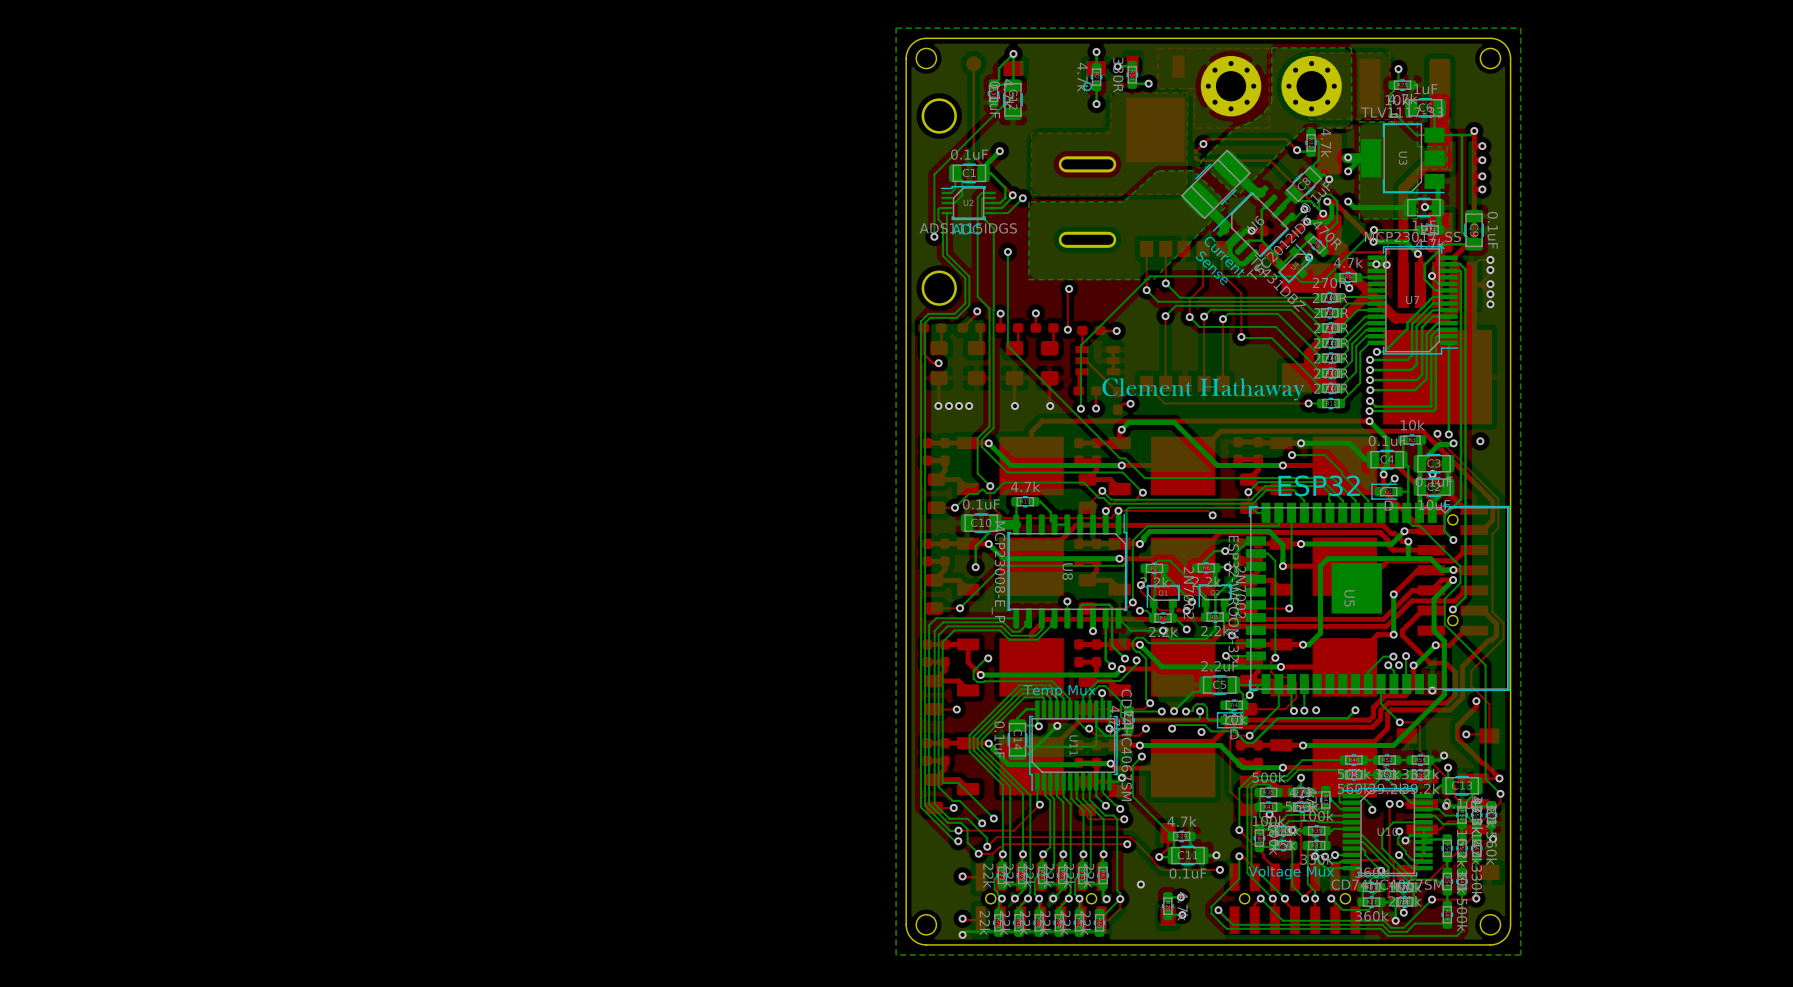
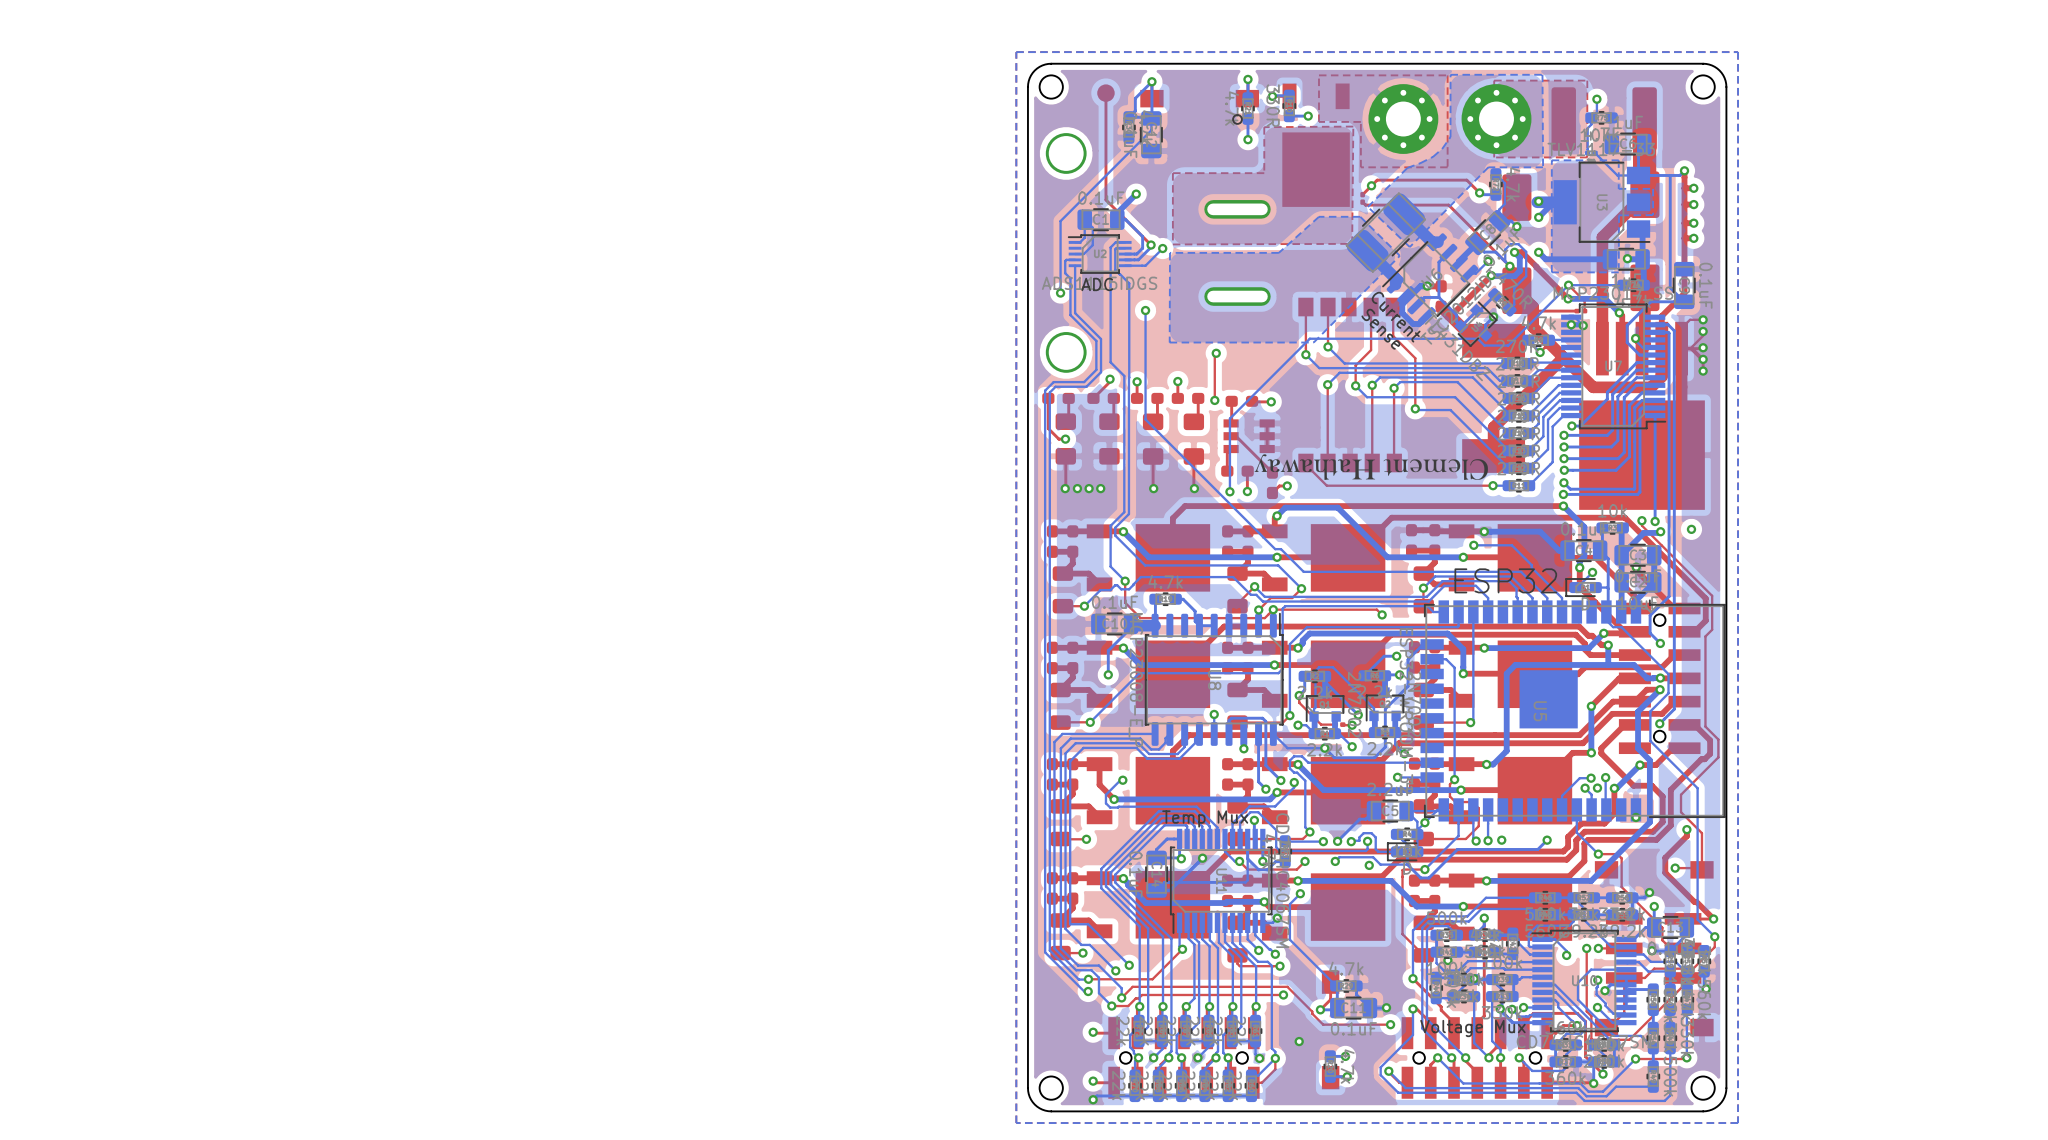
drawing shape: [1102, 378, 1305, 401] -> [1254, 454, 1488, 480]

